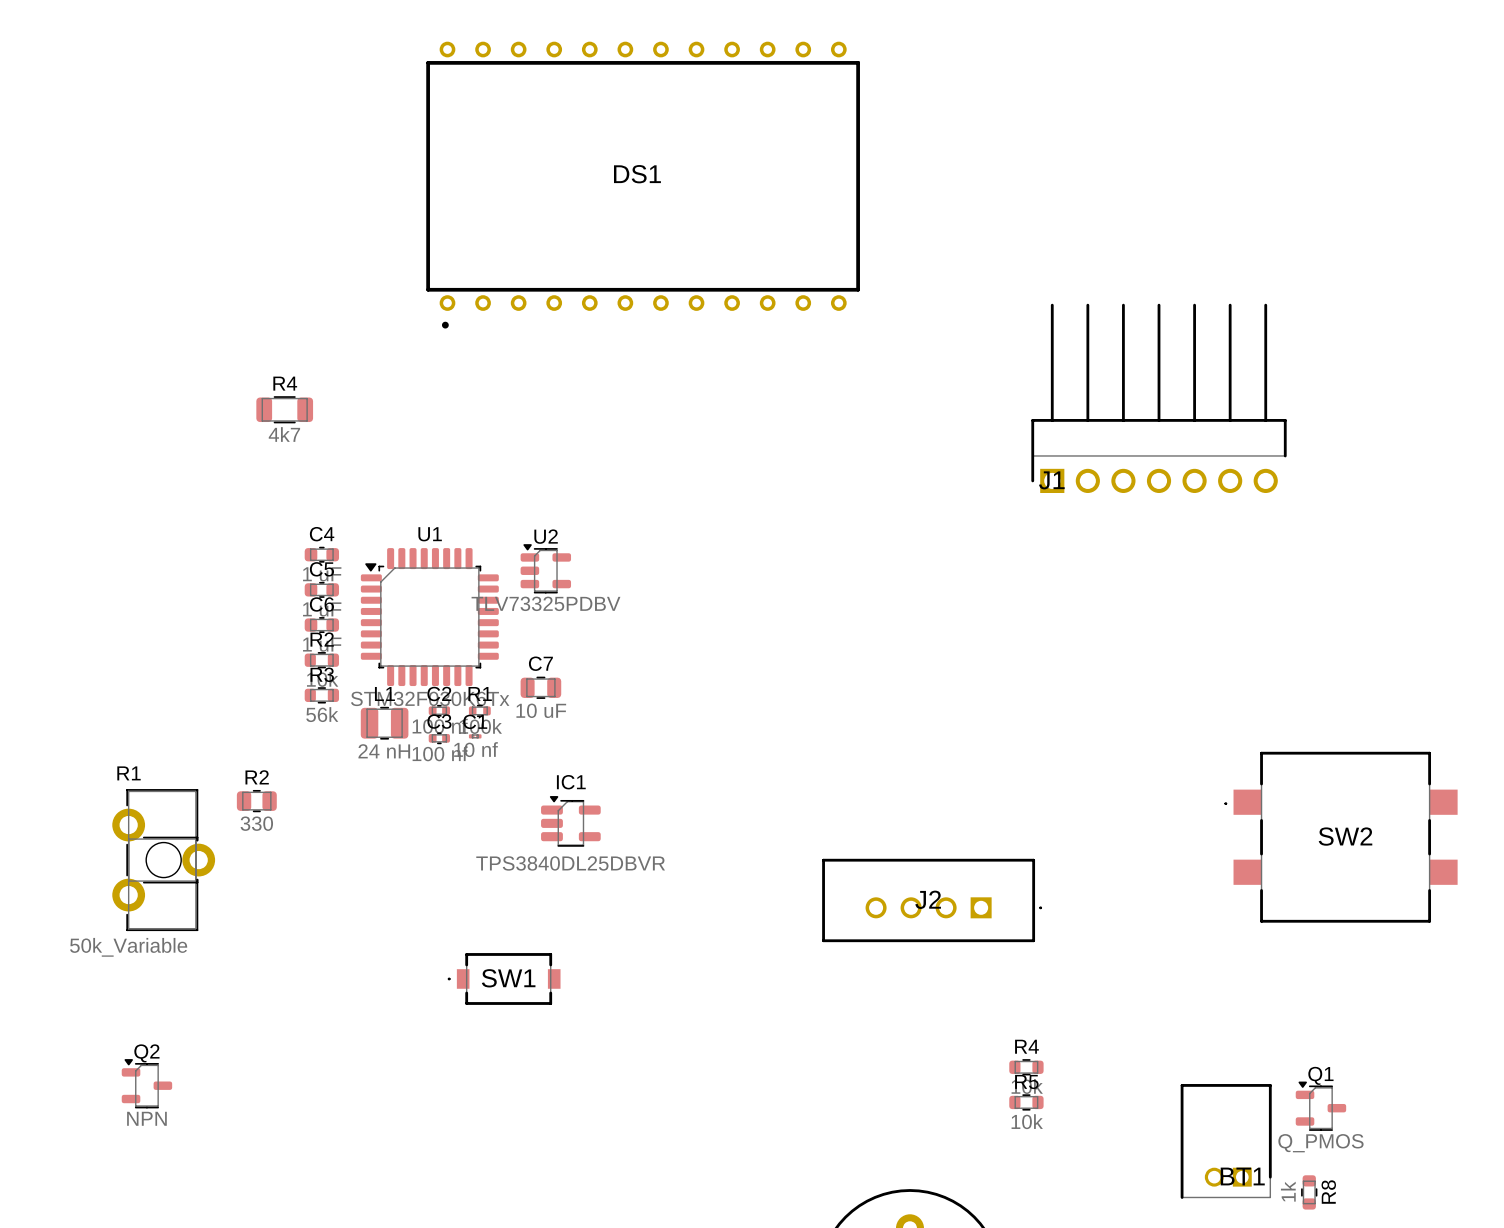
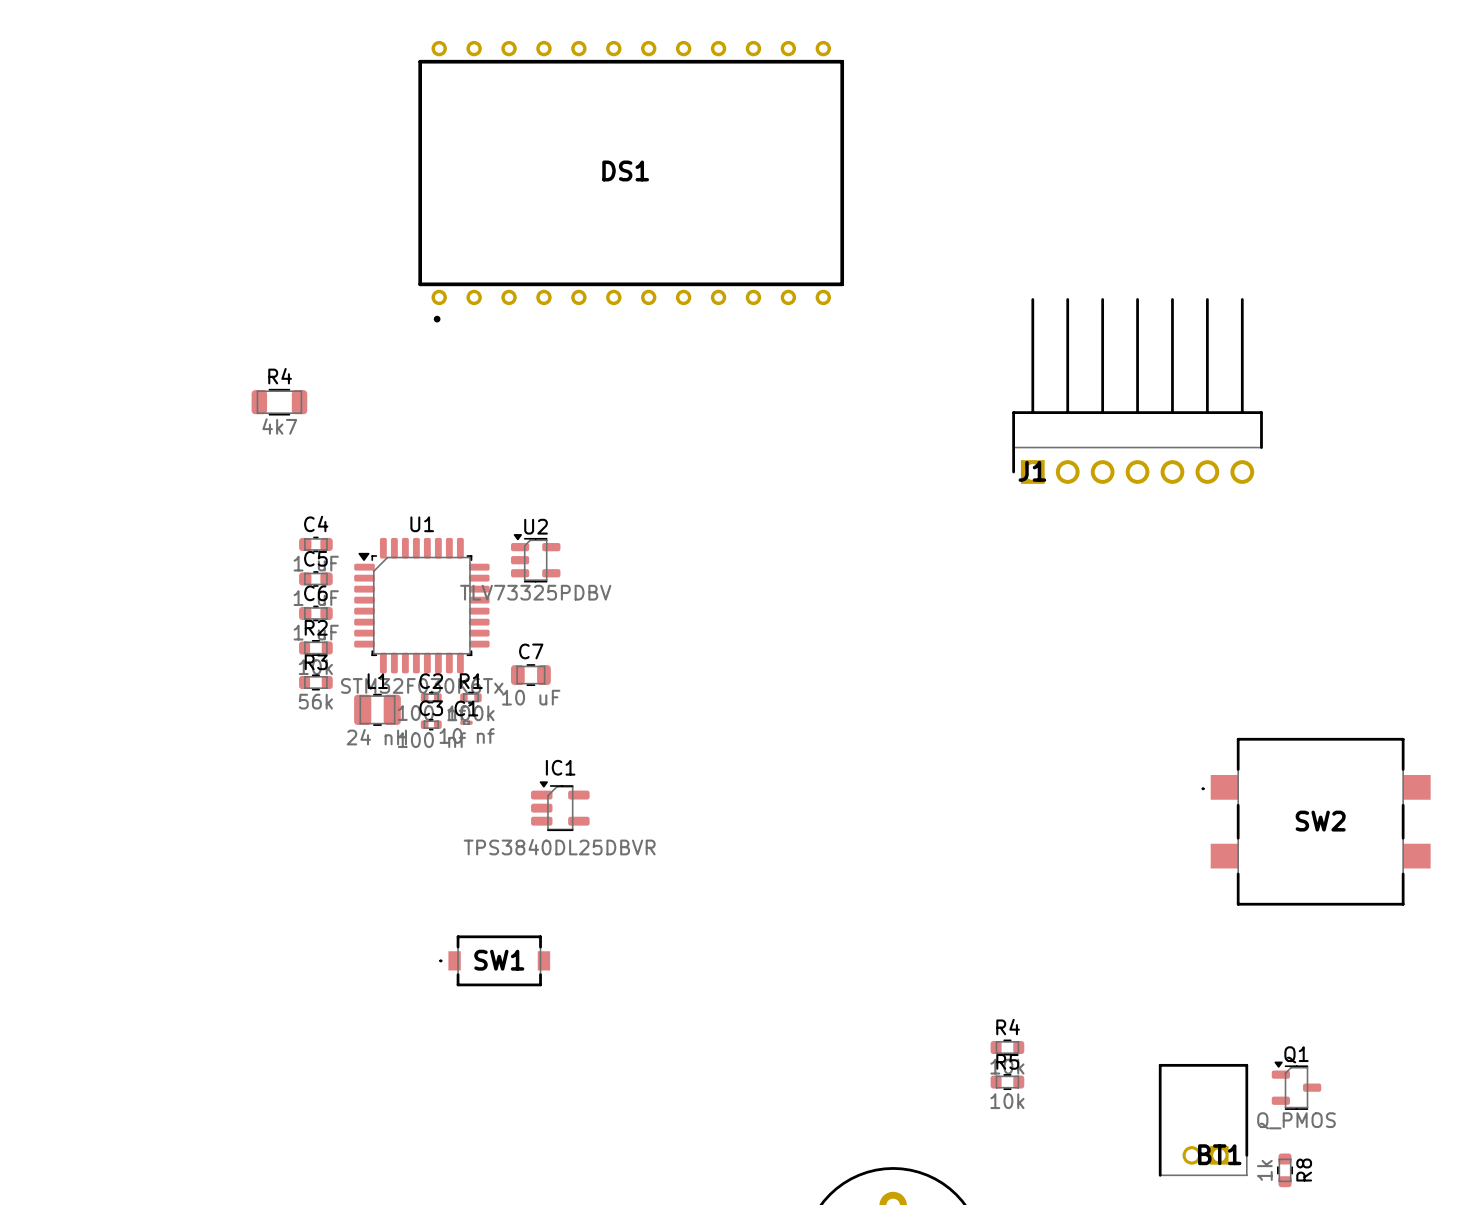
R2: 330 (256, 801) -> none
R1: 50k_Variable (163, 860) -> none
J2: (932, 900) -> none
Q2: NPN (146, 1083) -> none

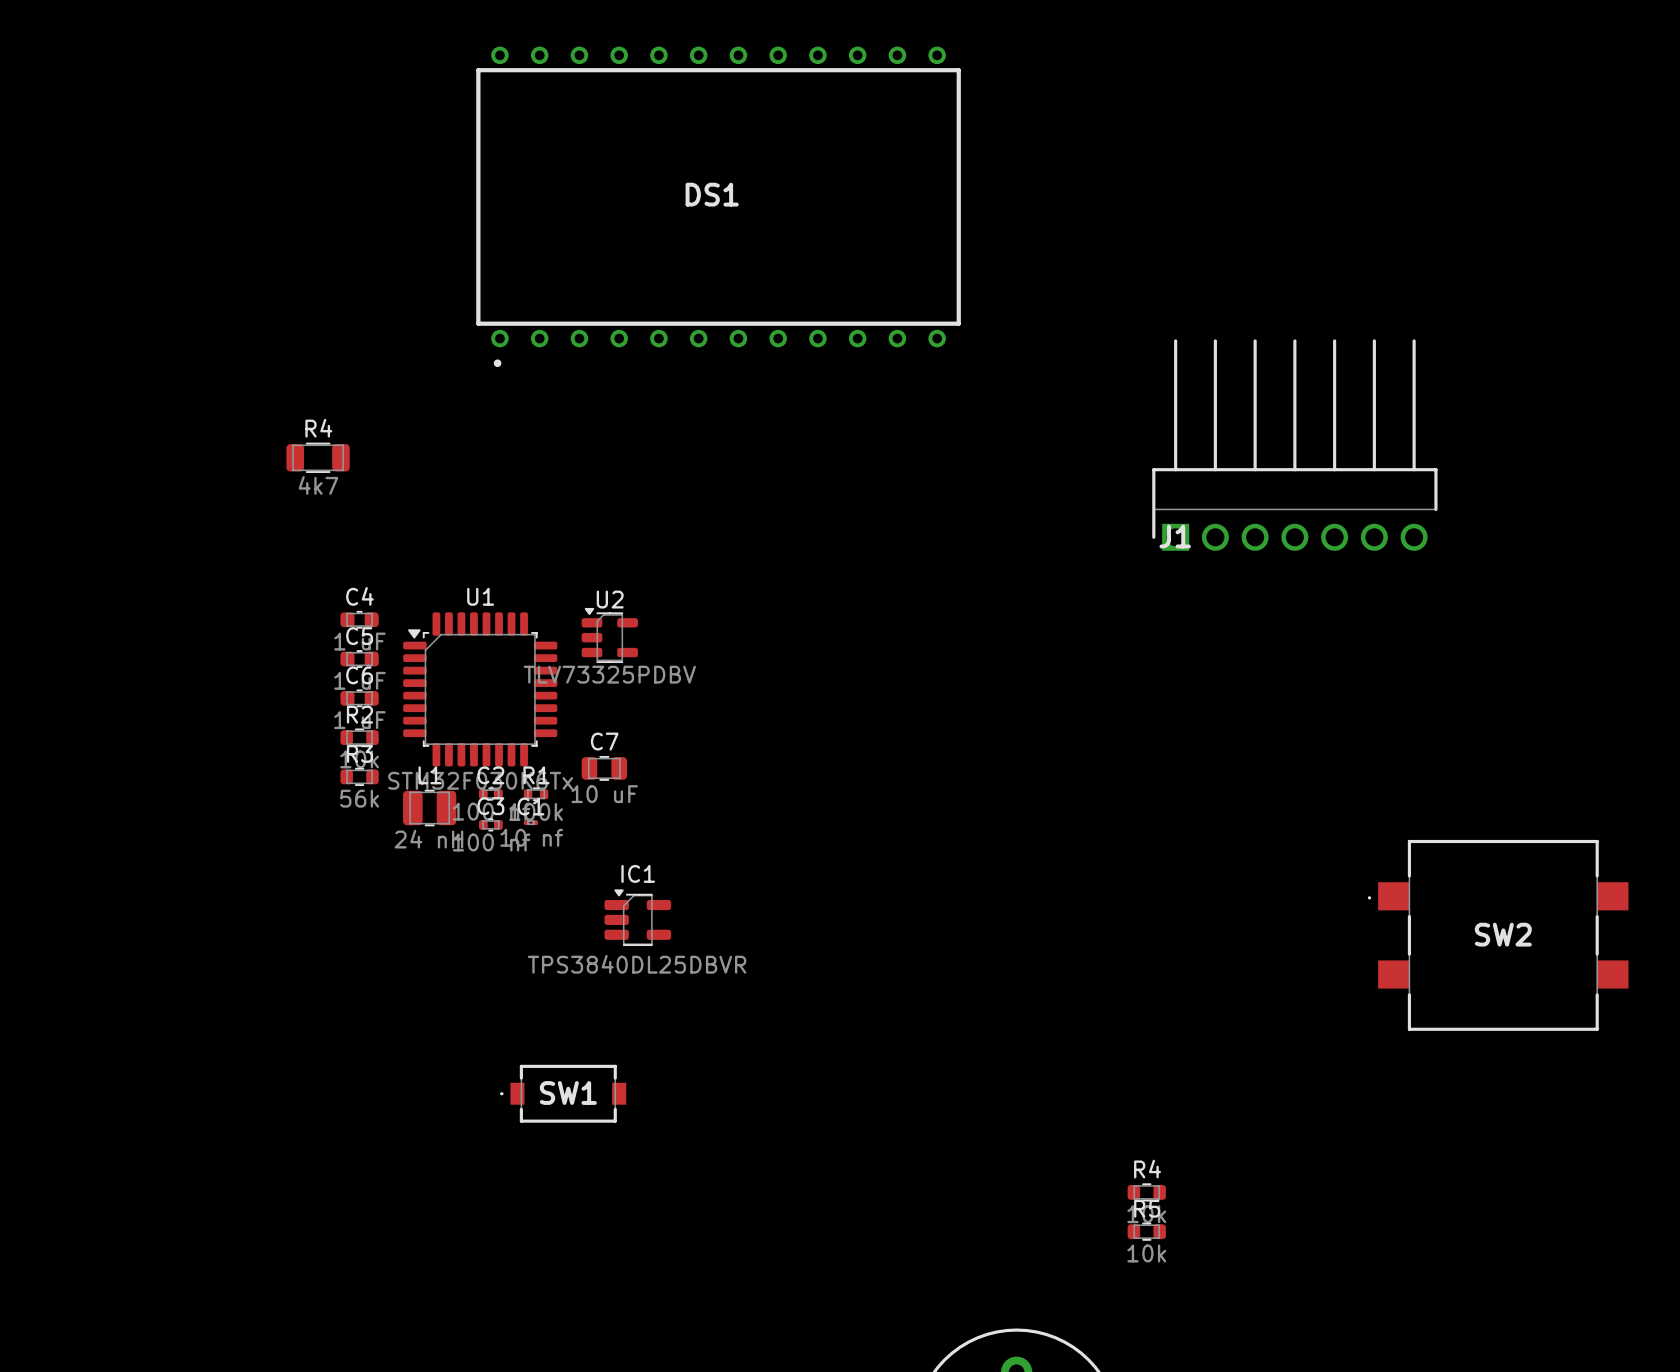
Q1: Q_PMOS (1296, 1085) -> none
BT1: (1203, 1120) -> none
R8: 1k (1285, 1170) -> none

